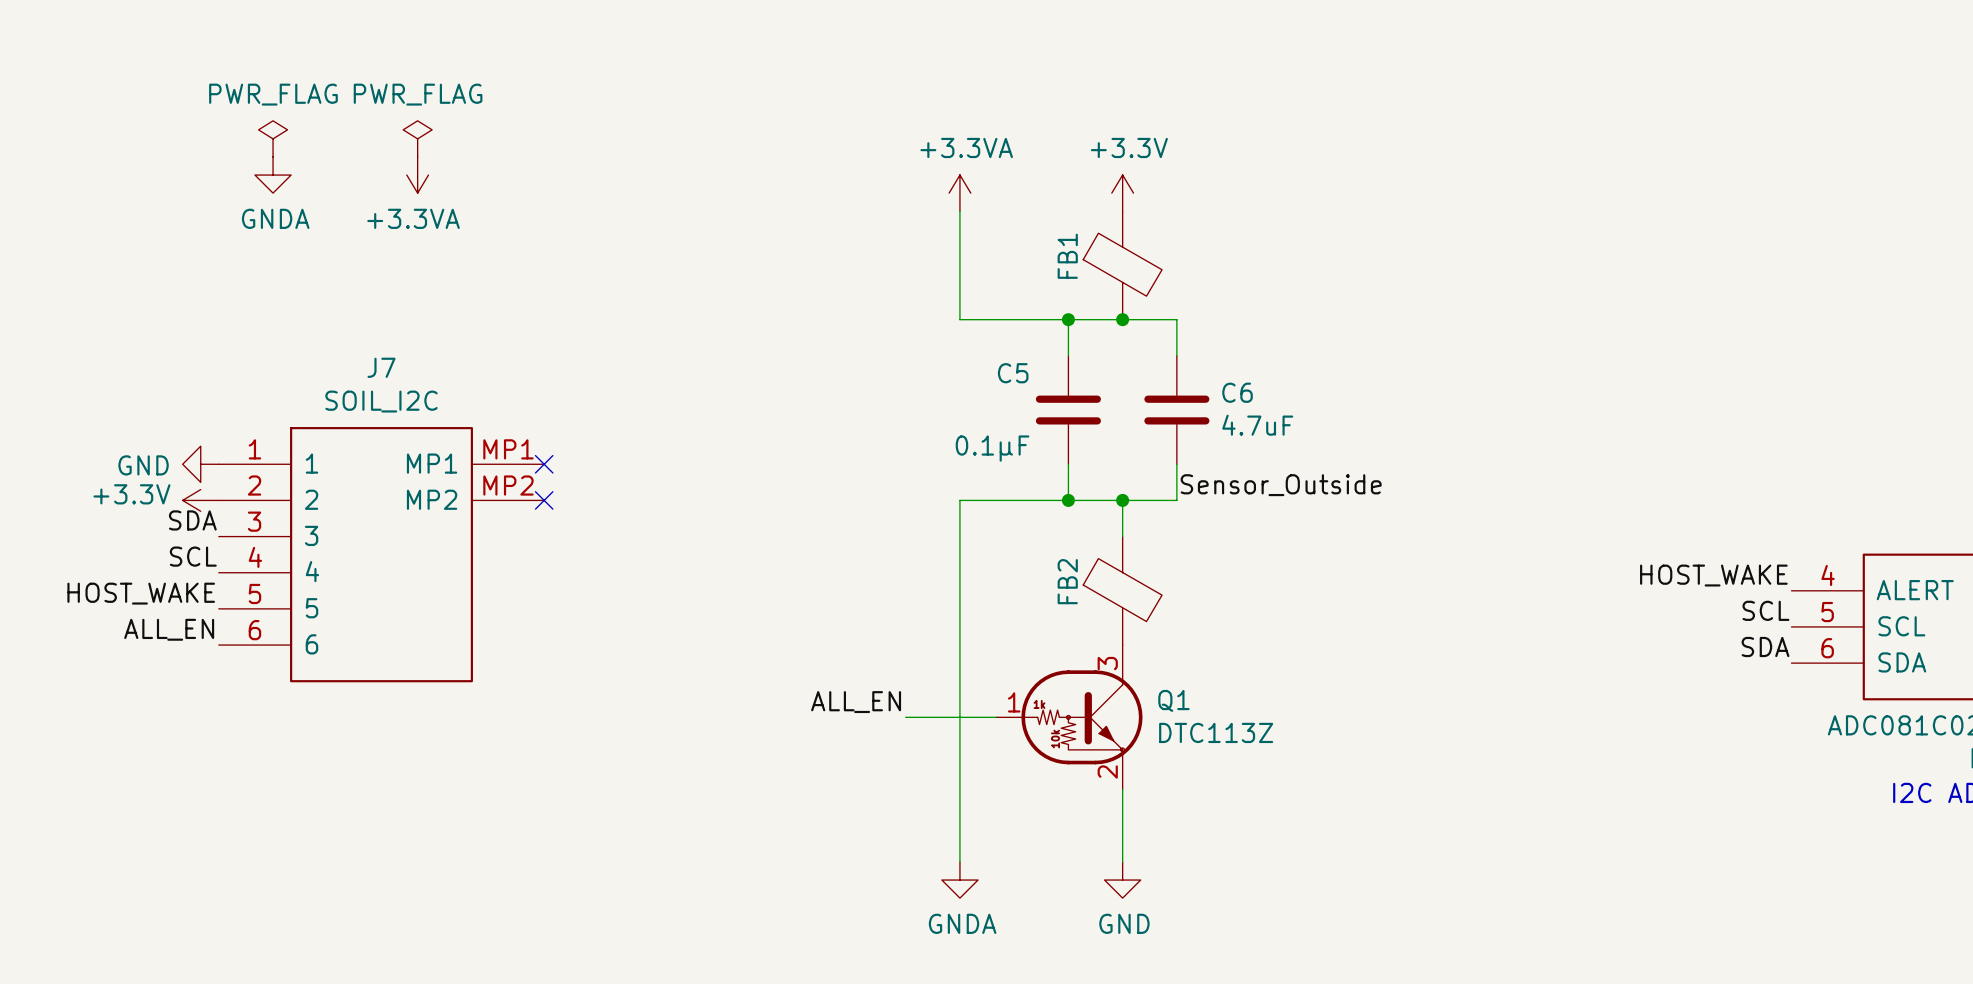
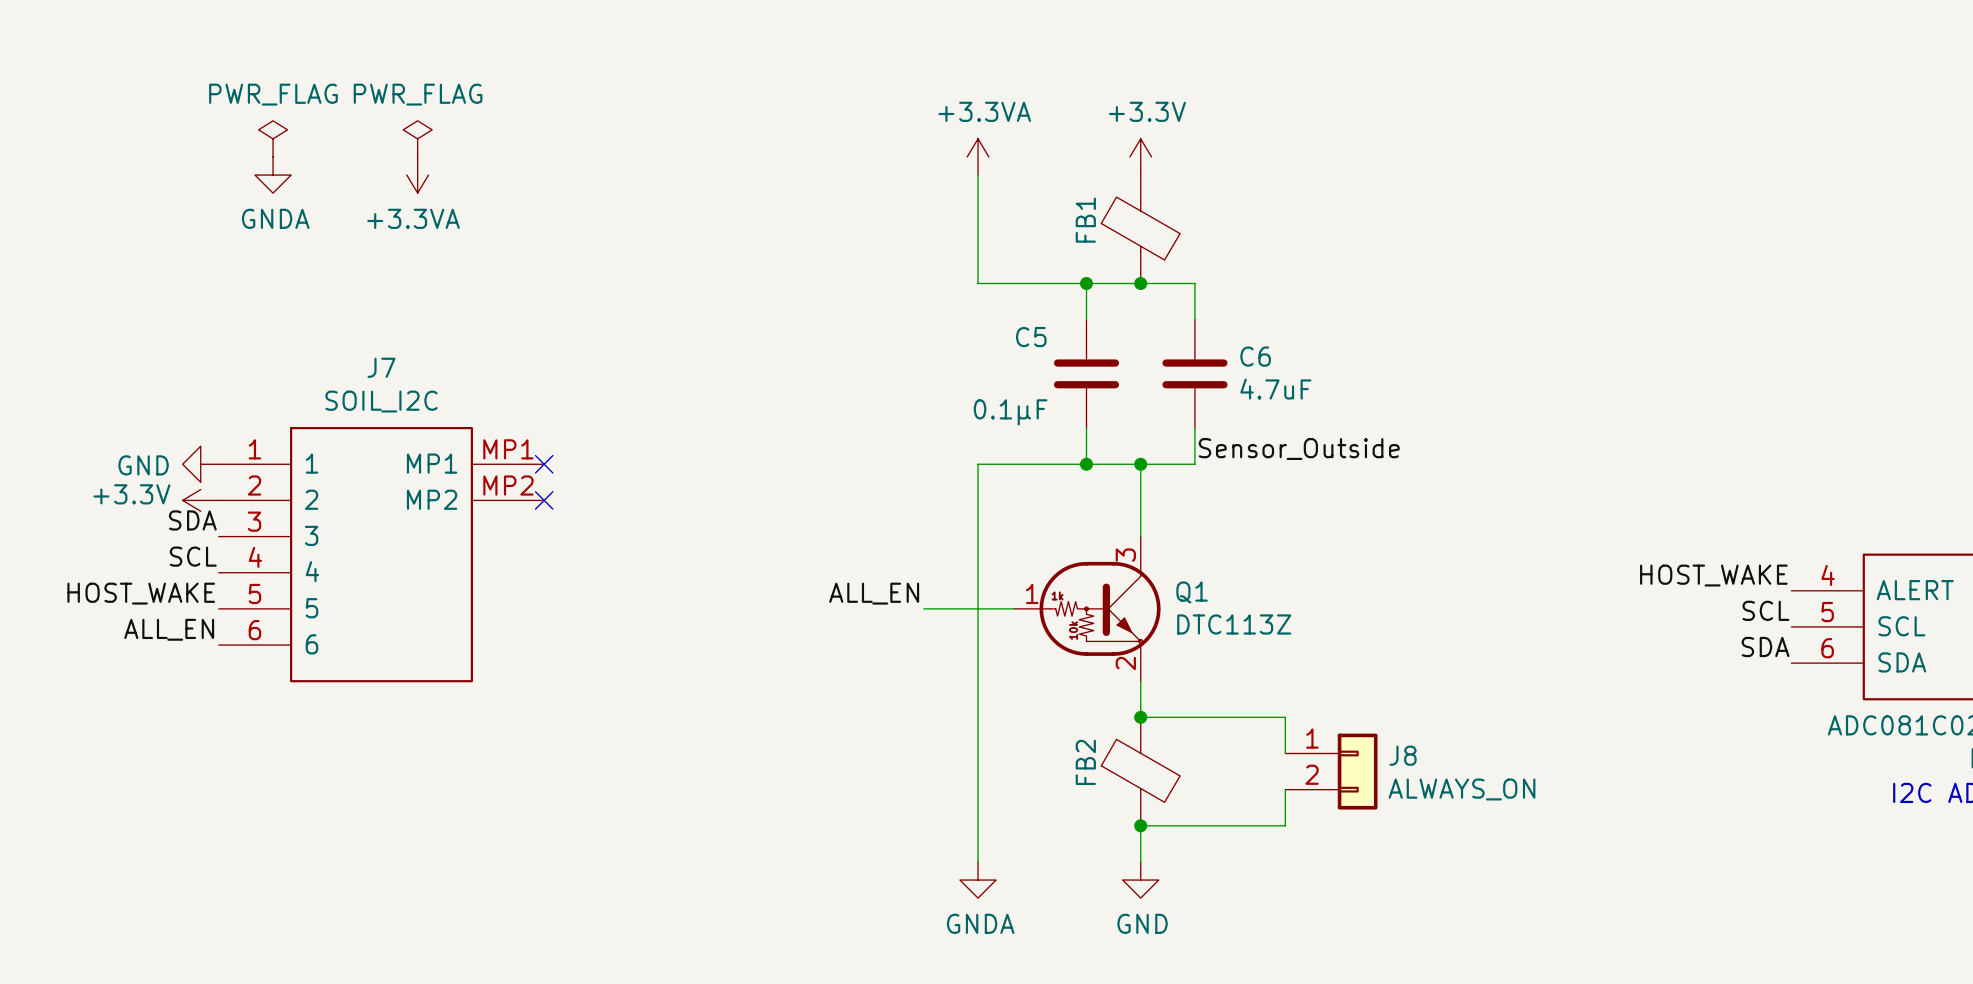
power symbol position: +3.3VA (959, 193) -> +3.3VA (978, 156)
power symbol position: +3.3V (1122, 193) -> +3.3V (1140, 156)
wire: (959, 211) (959, 319) (1176, 319) (1176, 355) -> (978, 175) (978, 283) (1194, 283) (1194, 319)
FB1 position: (1122, 265) -> (1140, 229)
junction: none -> (1086, 283)
junction: none -> (1140, 283)
wire: (1068, 319) (1068, 355) -> (1086, 283) (1086, 319)
junction: (1068, 319) -> none
junction: (1122, 319) -> none
C5 position: (1068, 410) -> (1086, 373)
C6 position: (1176, 410) -> (1194, 373)
wire: none -> (1194, 428) (1194, 464) (978, 464) (978, 861)
wire: (1068, 464) (1068, 500) -> (1086, 428) (1086, 464)
junction: none -> (1086, 464)
junction: none -> (1140, 464)
wire: (1176, 464) (1176, 500) (959, 500) (959, 861) -> none
label position: Sensor_Outside (1281, 485) -> Sensor_Outside (1299, 449)
junction: (1068, 500) -> none
wire: (1122, 500) (1122, 536) -> none
junction: (1122, 500) -> none
FB2 position: (1122, 590) -> (1140, 771)
wire: none -> (1140, 681) (1140, 717) (1285, 717) (1285, 753)
label position: ALL_EN (856, 702) -> ALL_EN (874, 593)
wire: (905, 717) (996, 717) -> (923, 608) (1014, 608)
Q1 position: (1069, 717) -> (1087, 608)
junction: none -> (1140, 717)
J8: none -> ALWAYS_ON (1331, 771)
wire: (1122, 789) (1122, 861) -> (1140, 464) (1140, 536)
wire: none -> (1285, 789) (1285, 825) (1140, 825) (1140, 861)
junction: none -> (1140, 825)
power symbol position: GNDA (959, 880) -> GNDA (978, 880)
power symbol position: GND (1122, 880) -> GND (1140, 880)

